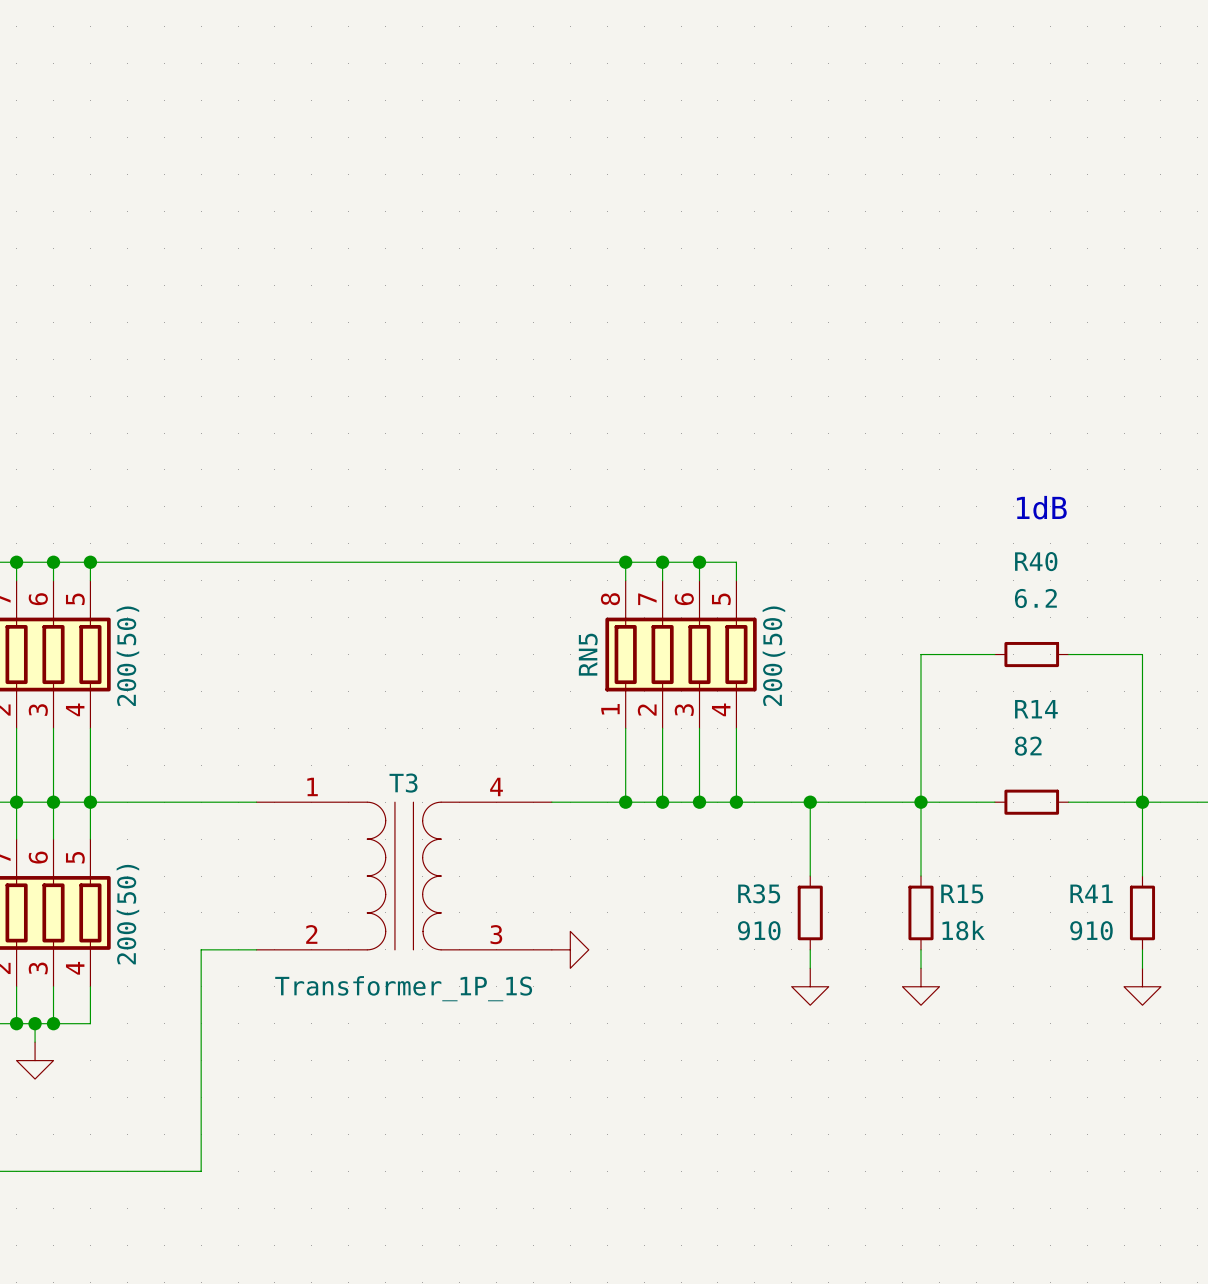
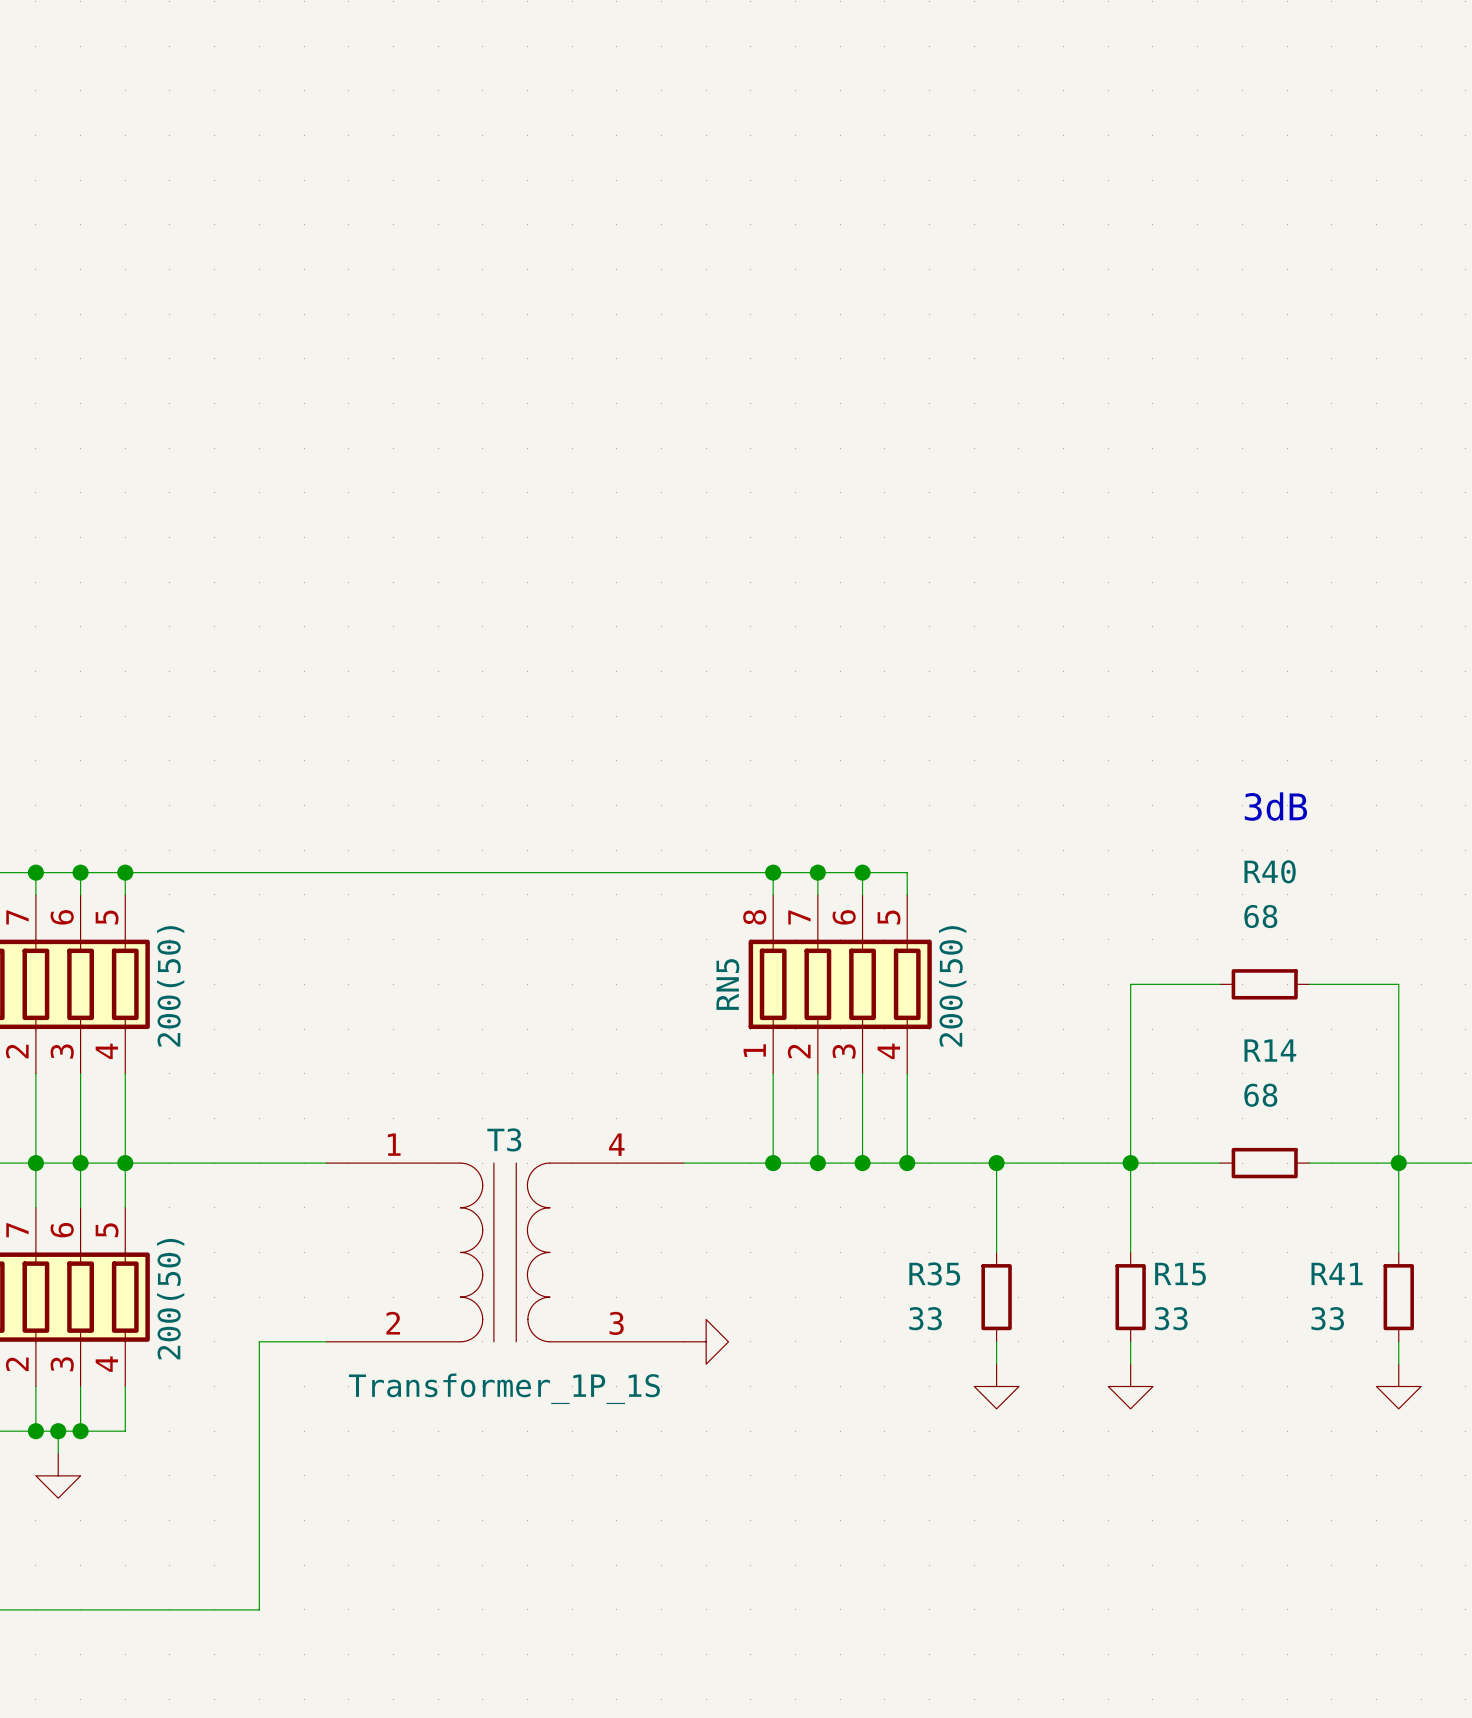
text: 1dB (1041, 507) -> 3dB (1275, 806)
R40 value: 6.2 (1035, 598) -> 68 (1260, 916)
R14 value: 82 (1028, 746) -> 68 (1260, 1095)
R35 value: 910 (759, 930) -> 33 (925, 1318)
R15 value: 18k (963, 930) -> 33 (1171, 1318)
R41 value: 910 (1091, 930) -> 33 (1327, 1318)

